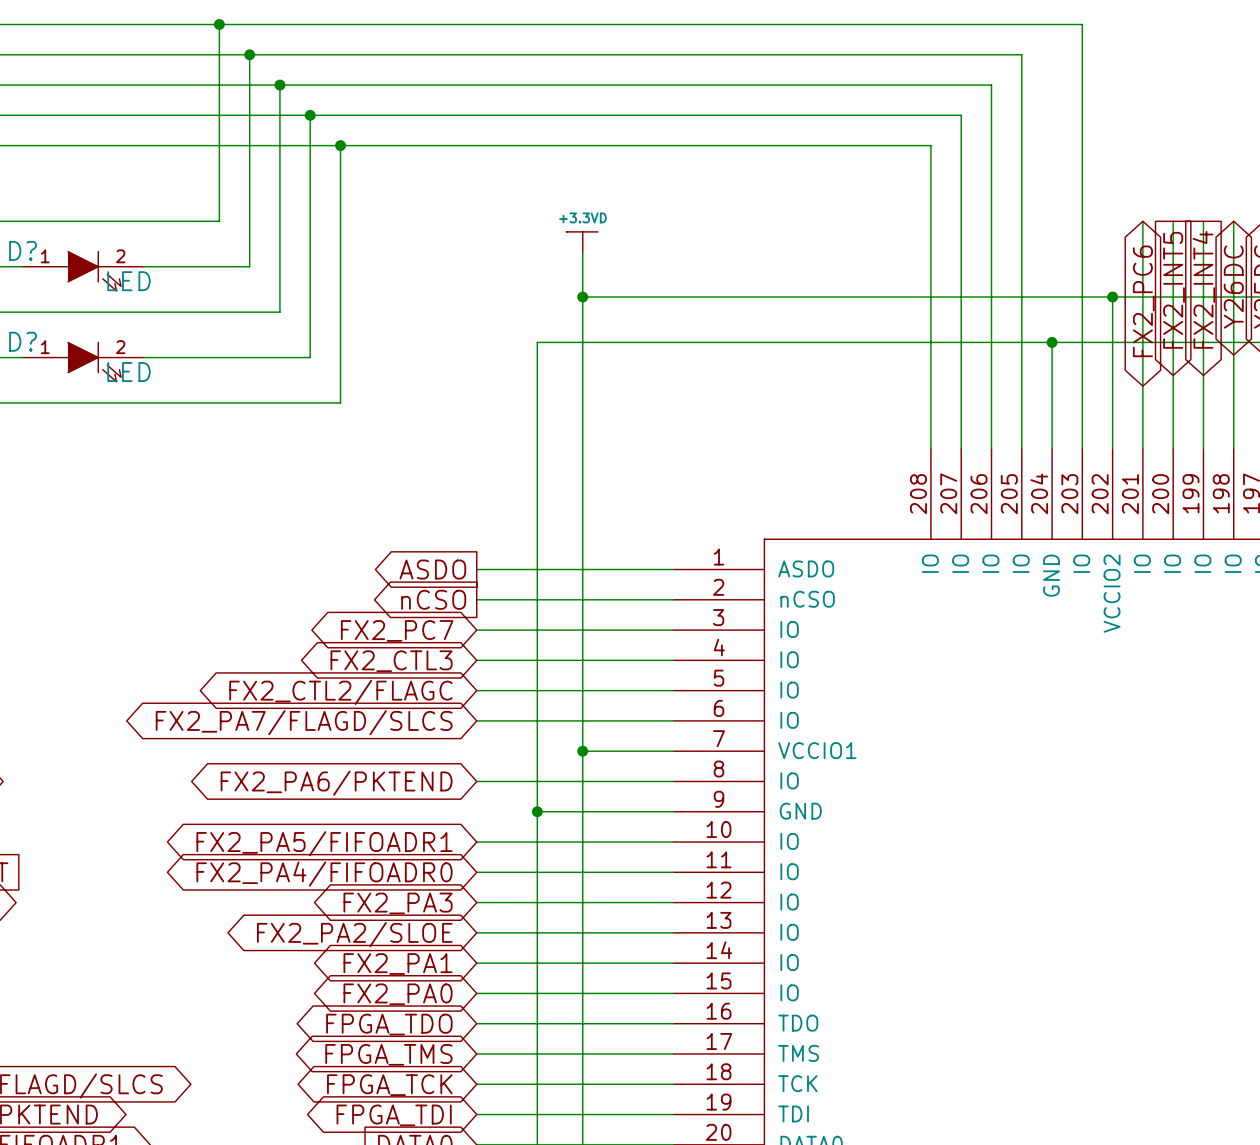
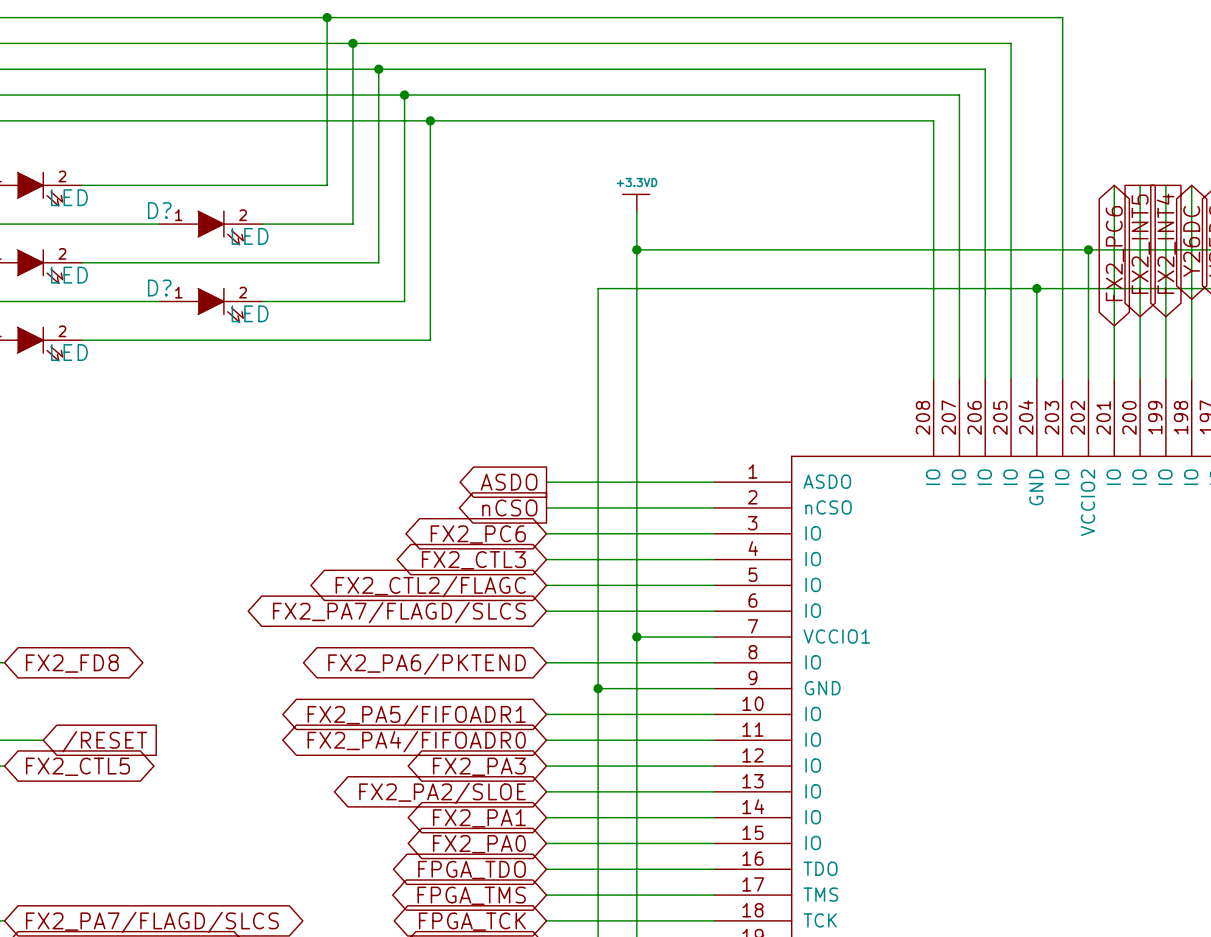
global label: FX2_PC7 (397, 630) -> FX2_PC6 (478, 534)

